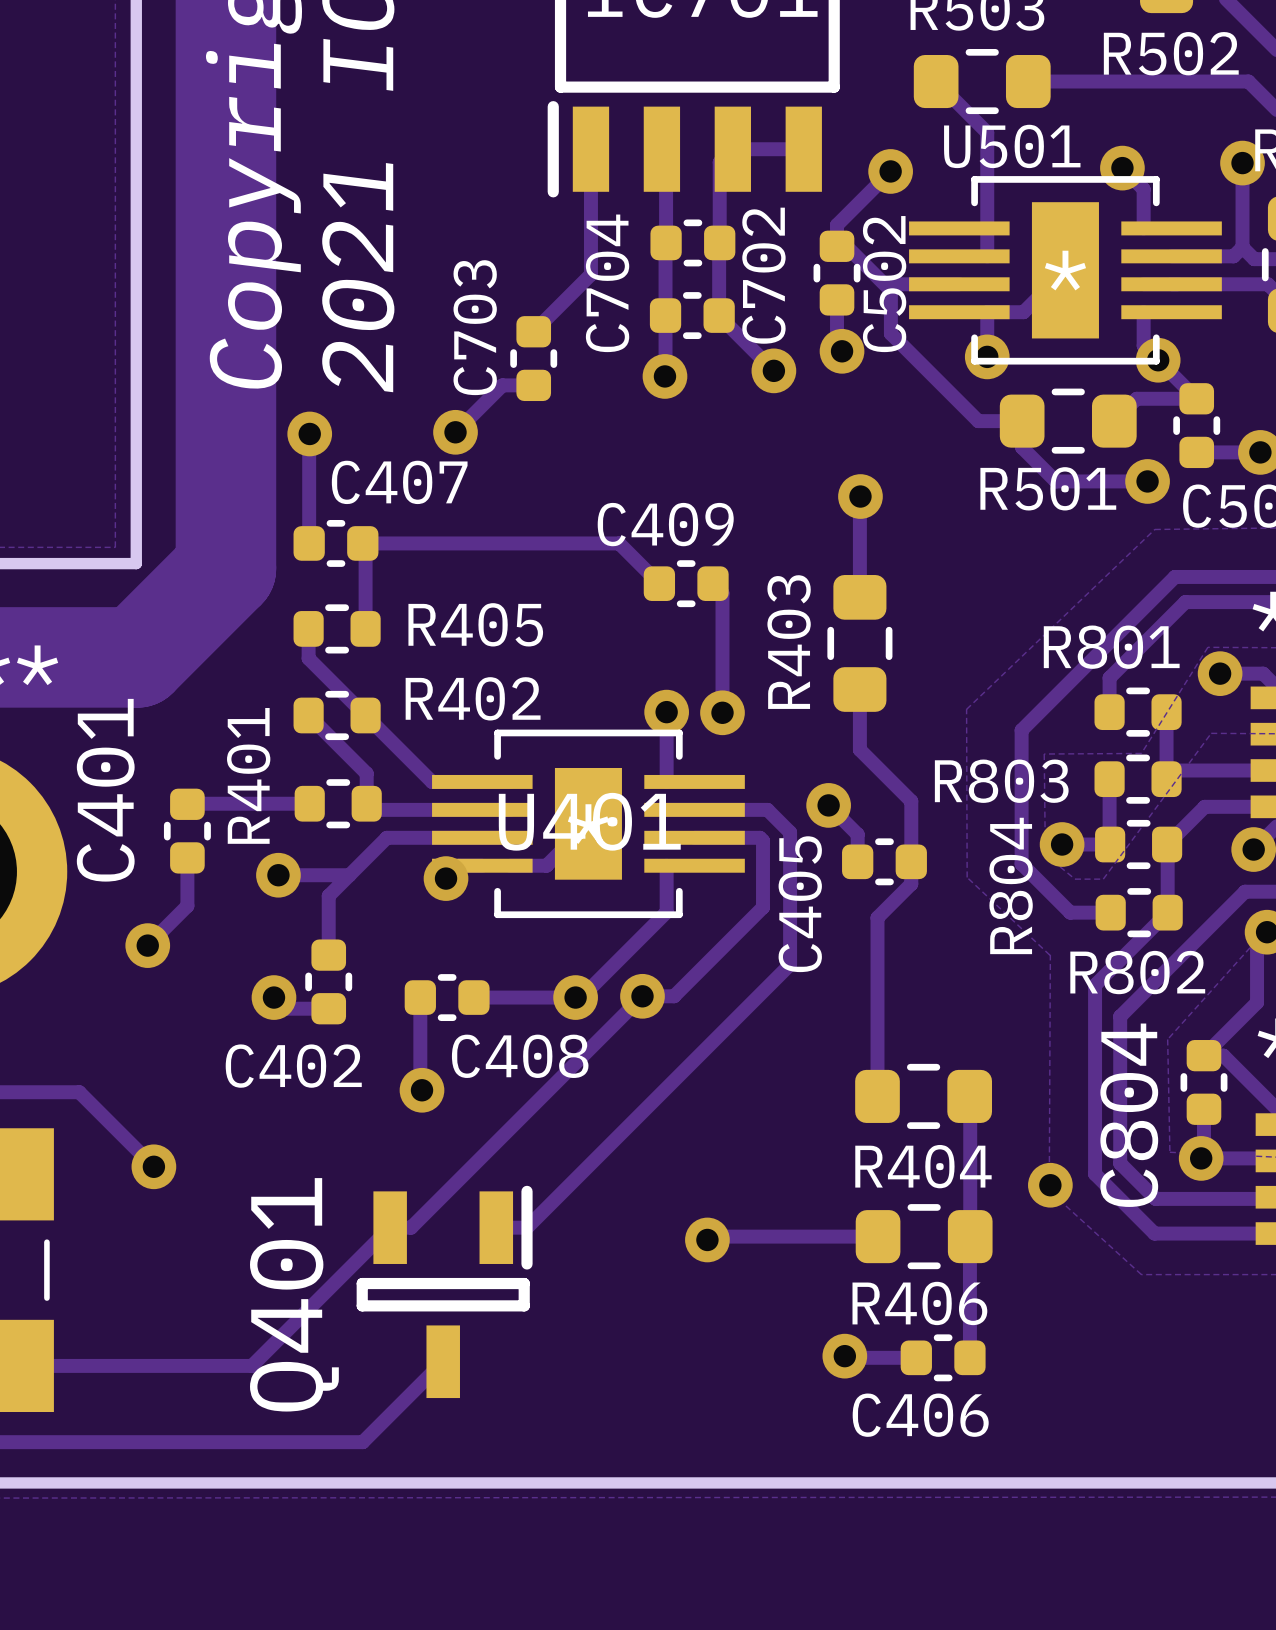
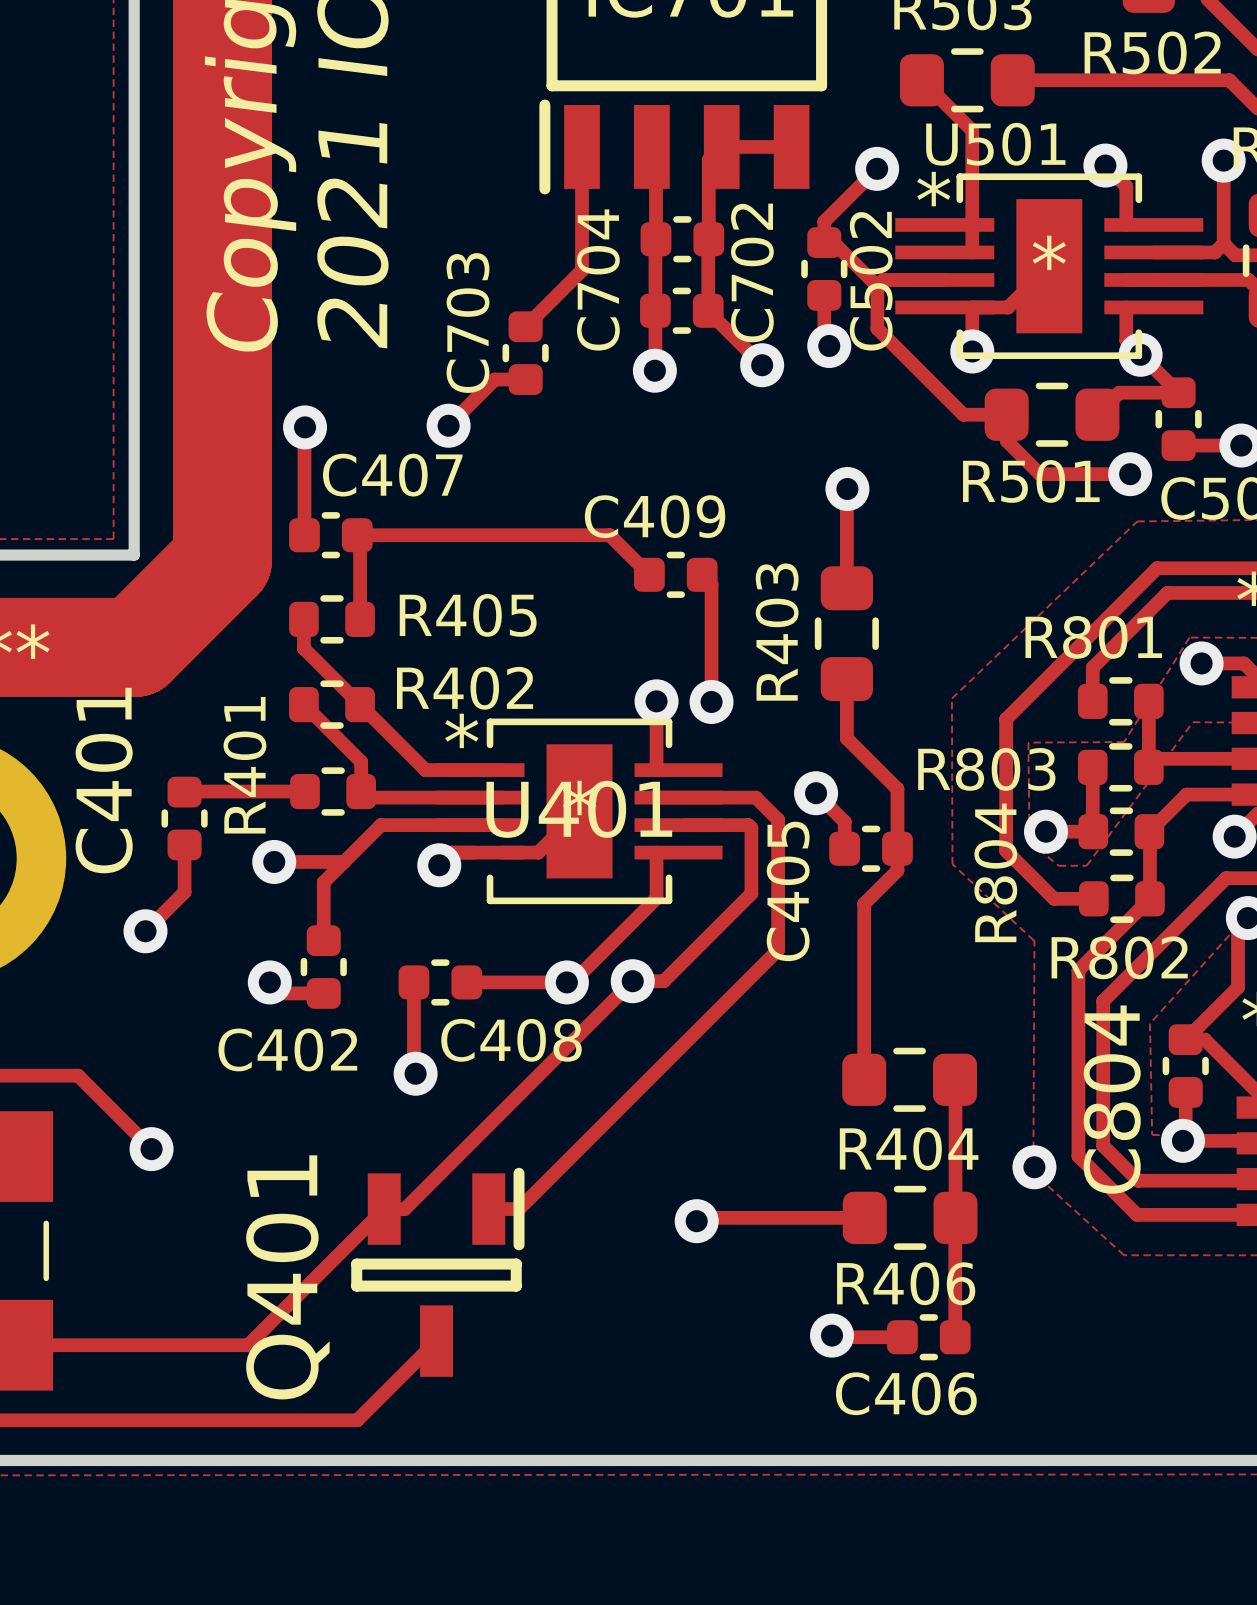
U501 text: none -> * (933, 189)
U401 footprint: [432, 729, 745, 919] -> [436, 718, 723, 905]

